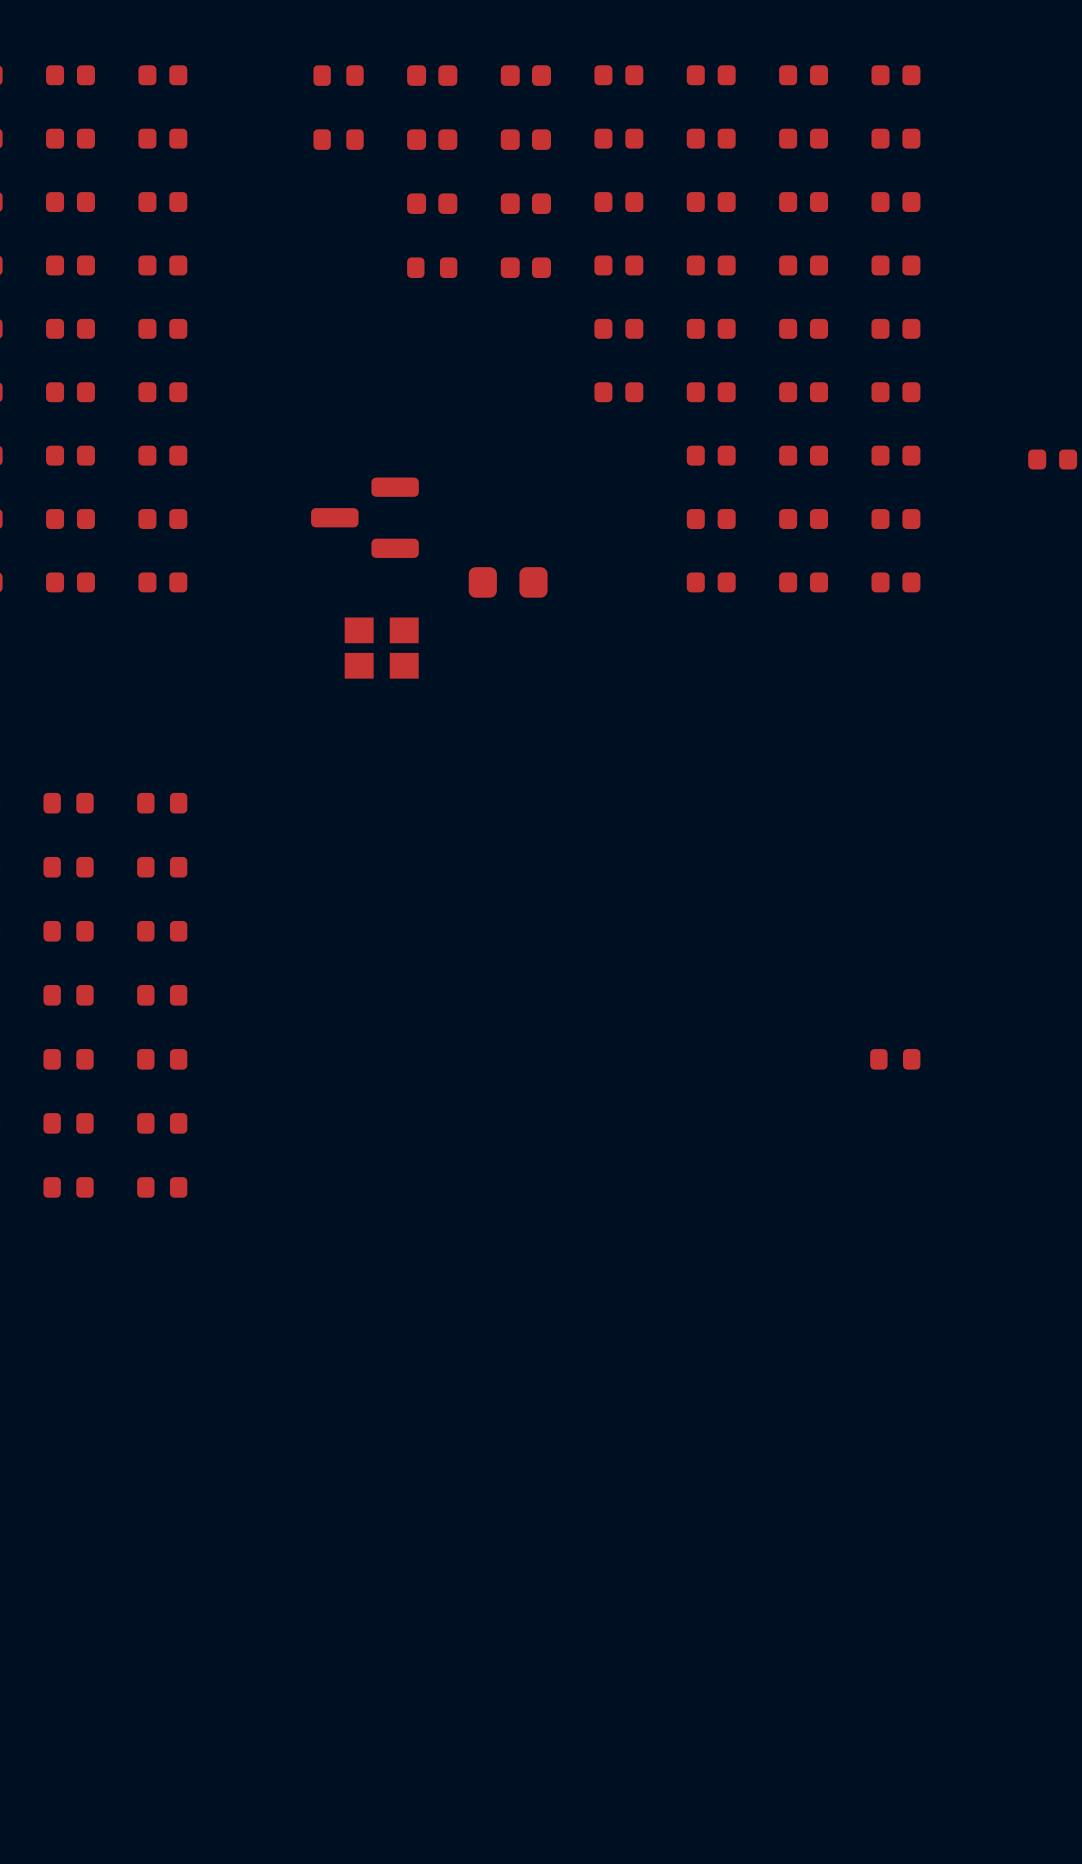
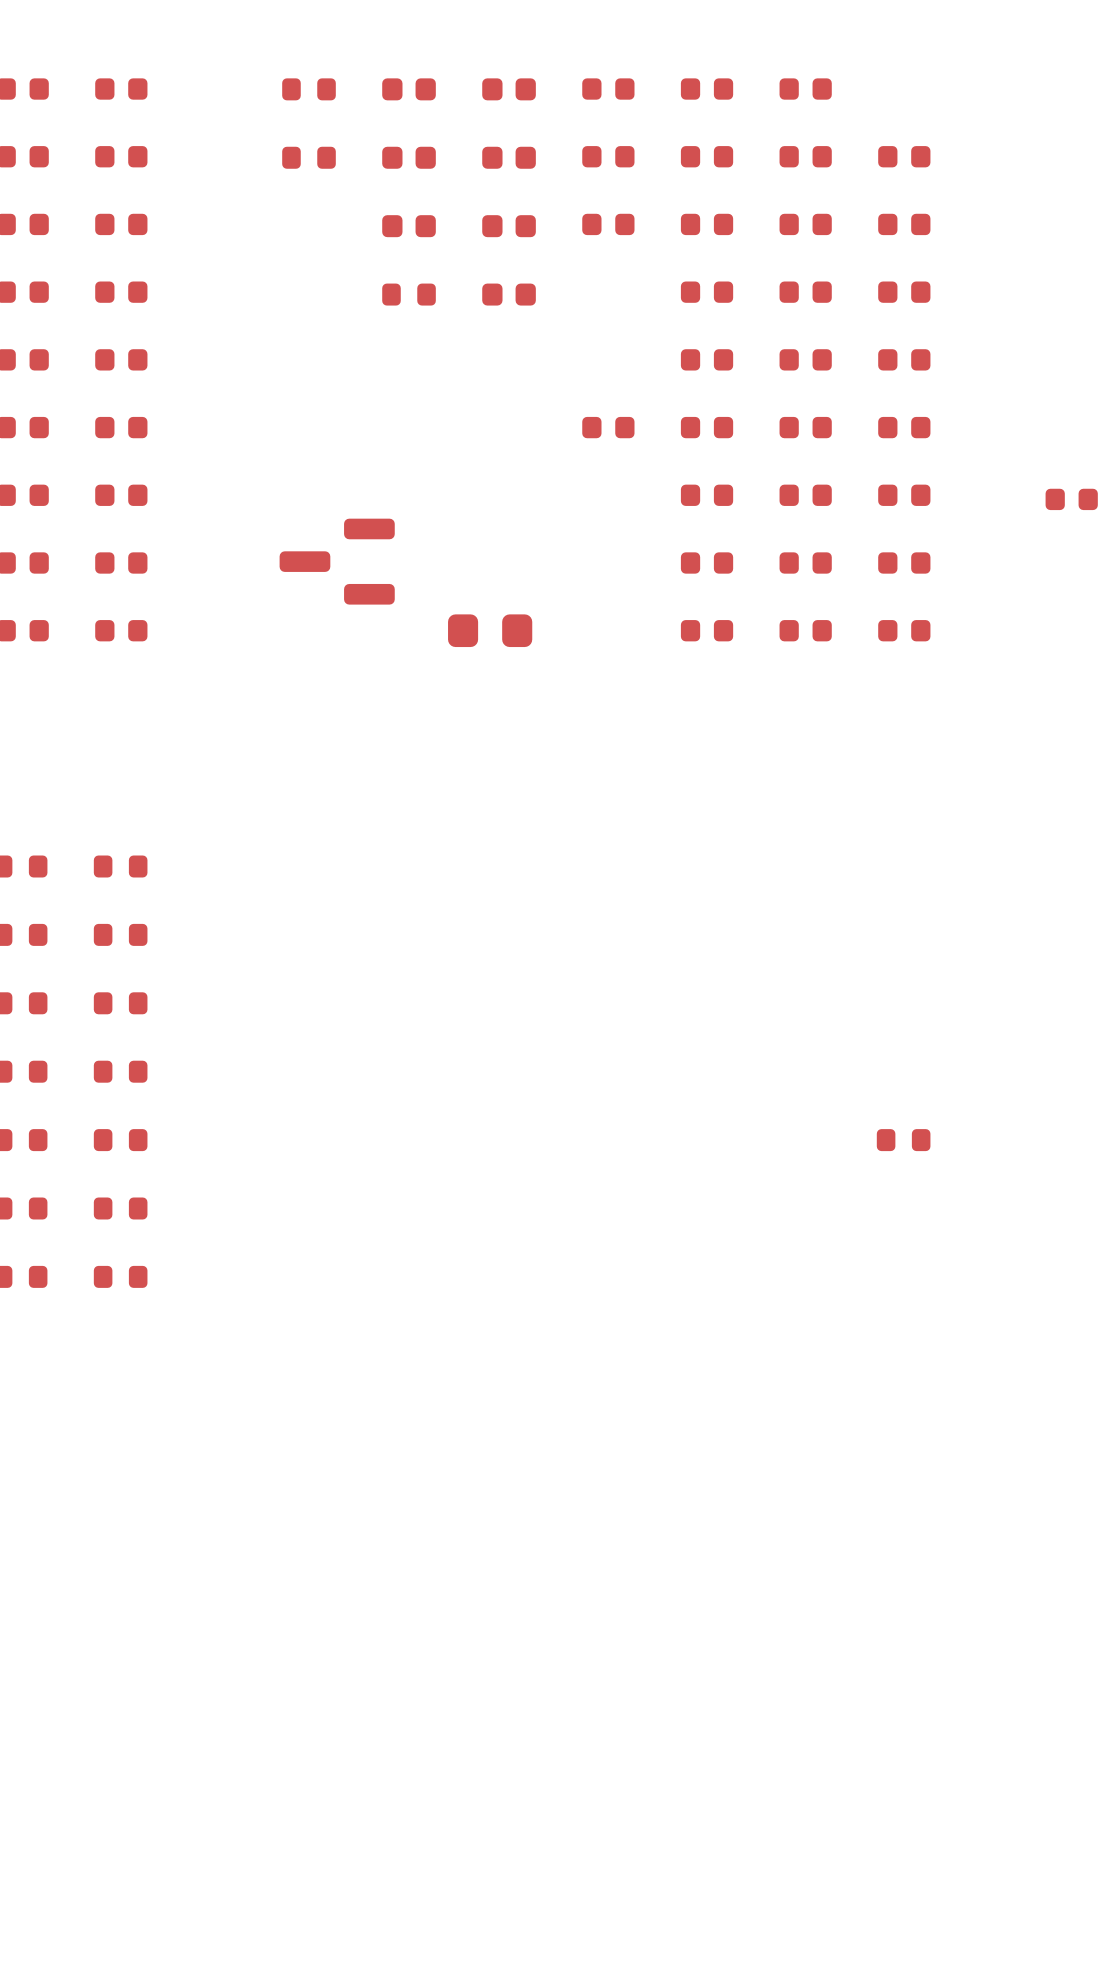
part: (895, 75) -> none
part: (618, 265) -> none
part: (618, 328) -> none
part: (381, 648) -> none

